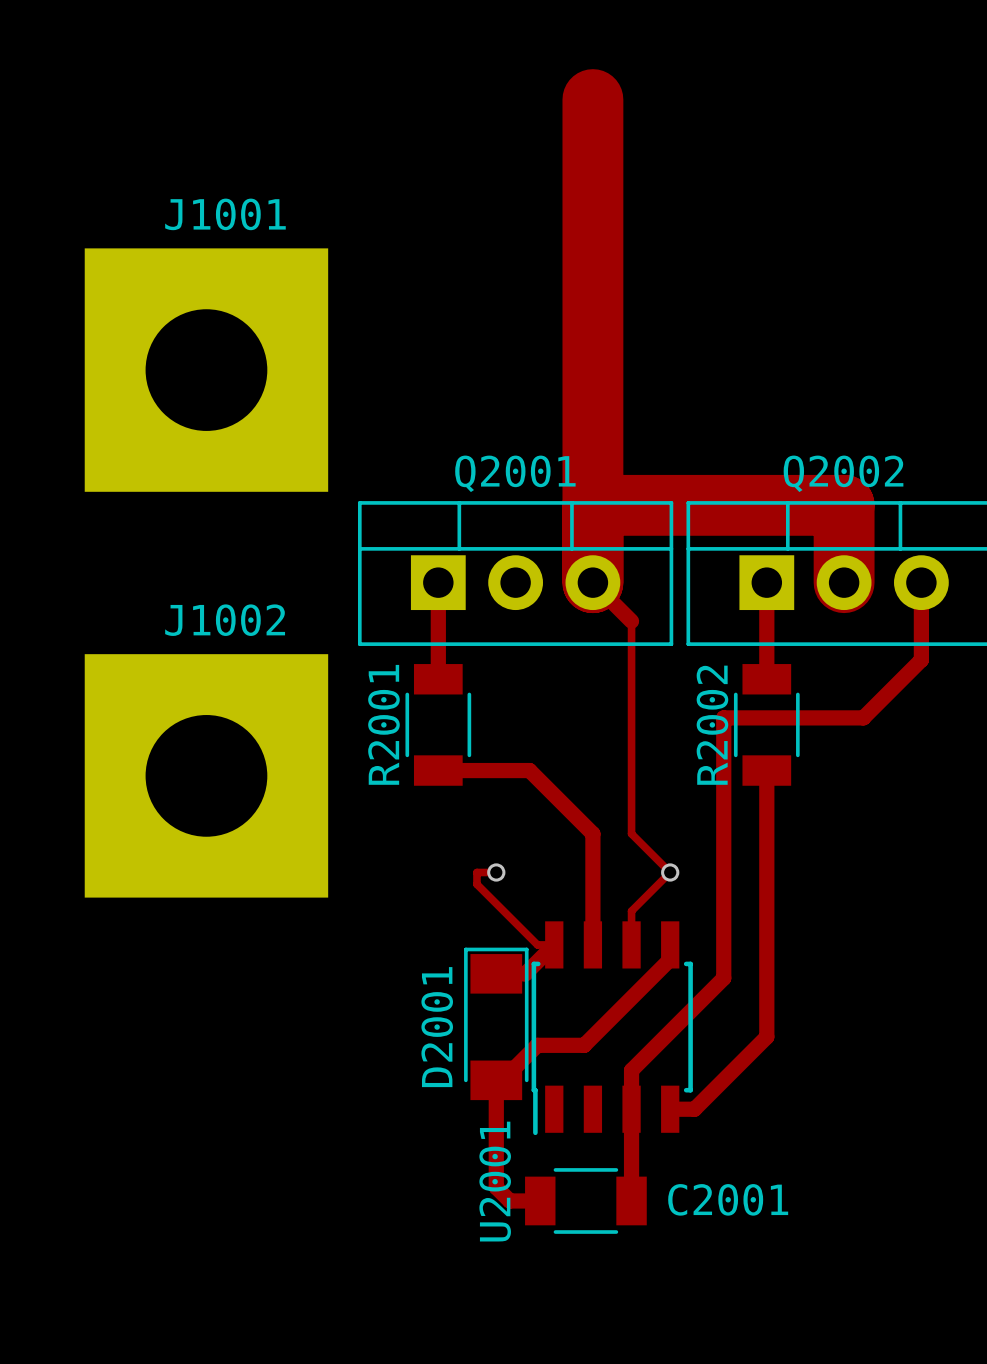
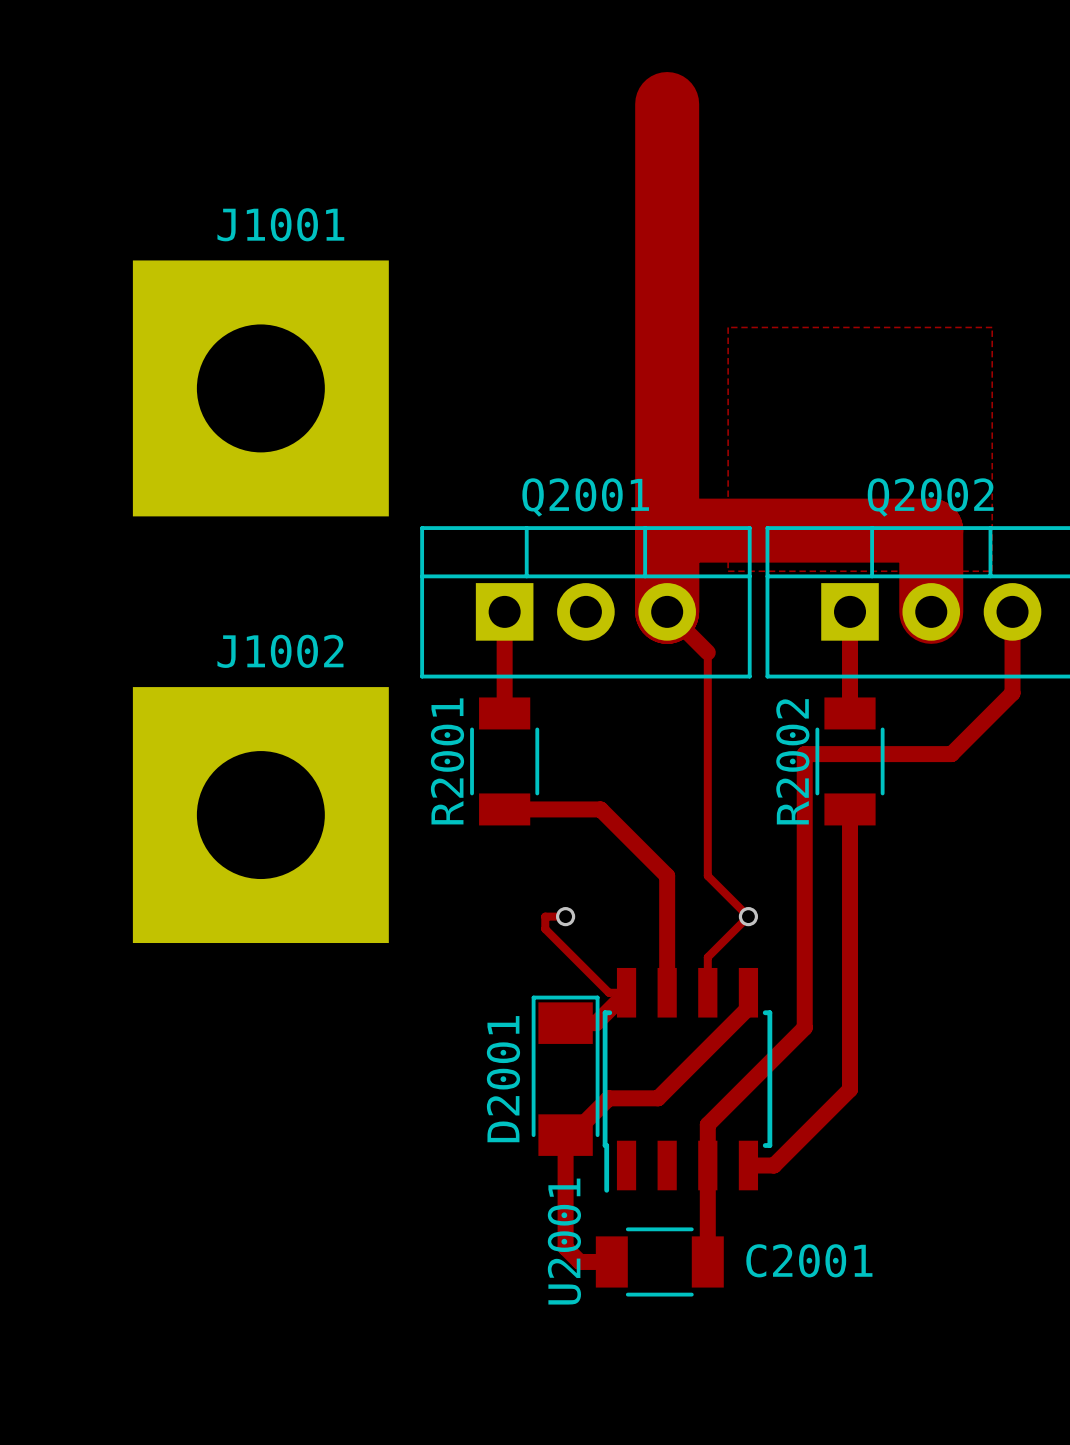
zone outline: none -> (728, 327) (728, 571) (992, 571) (992, 327) (728, 327)

